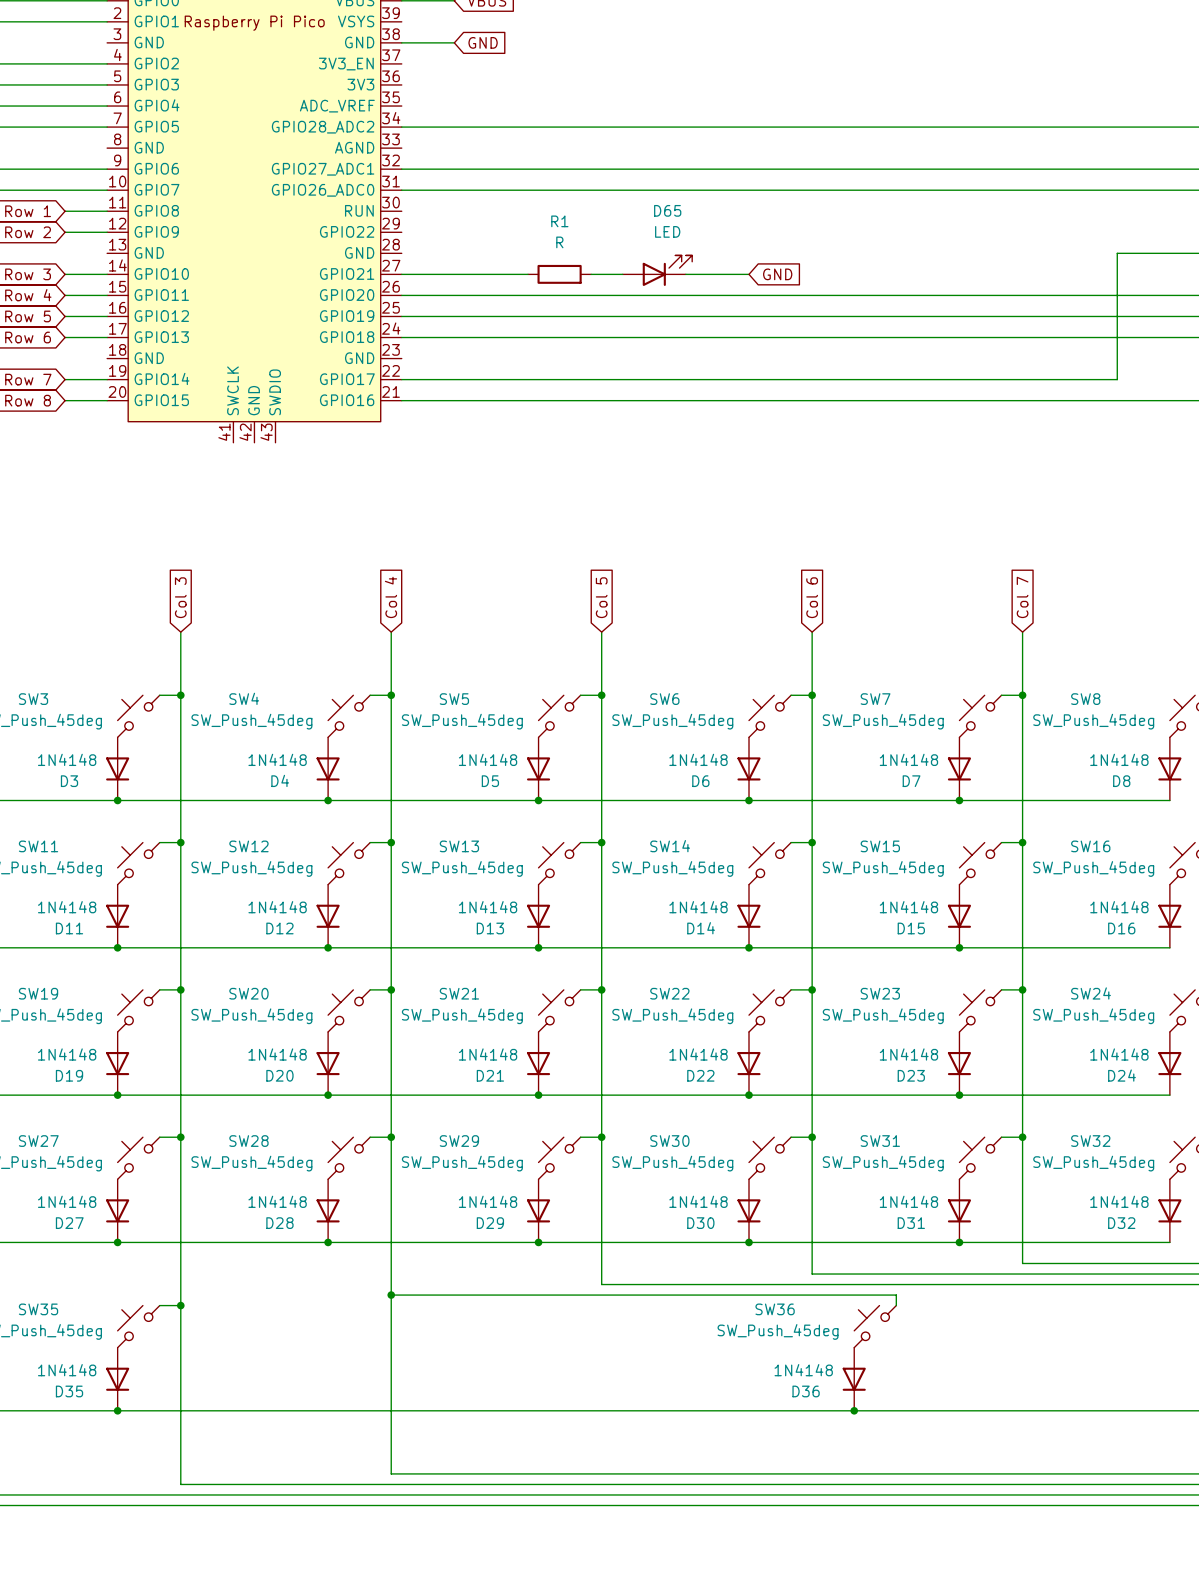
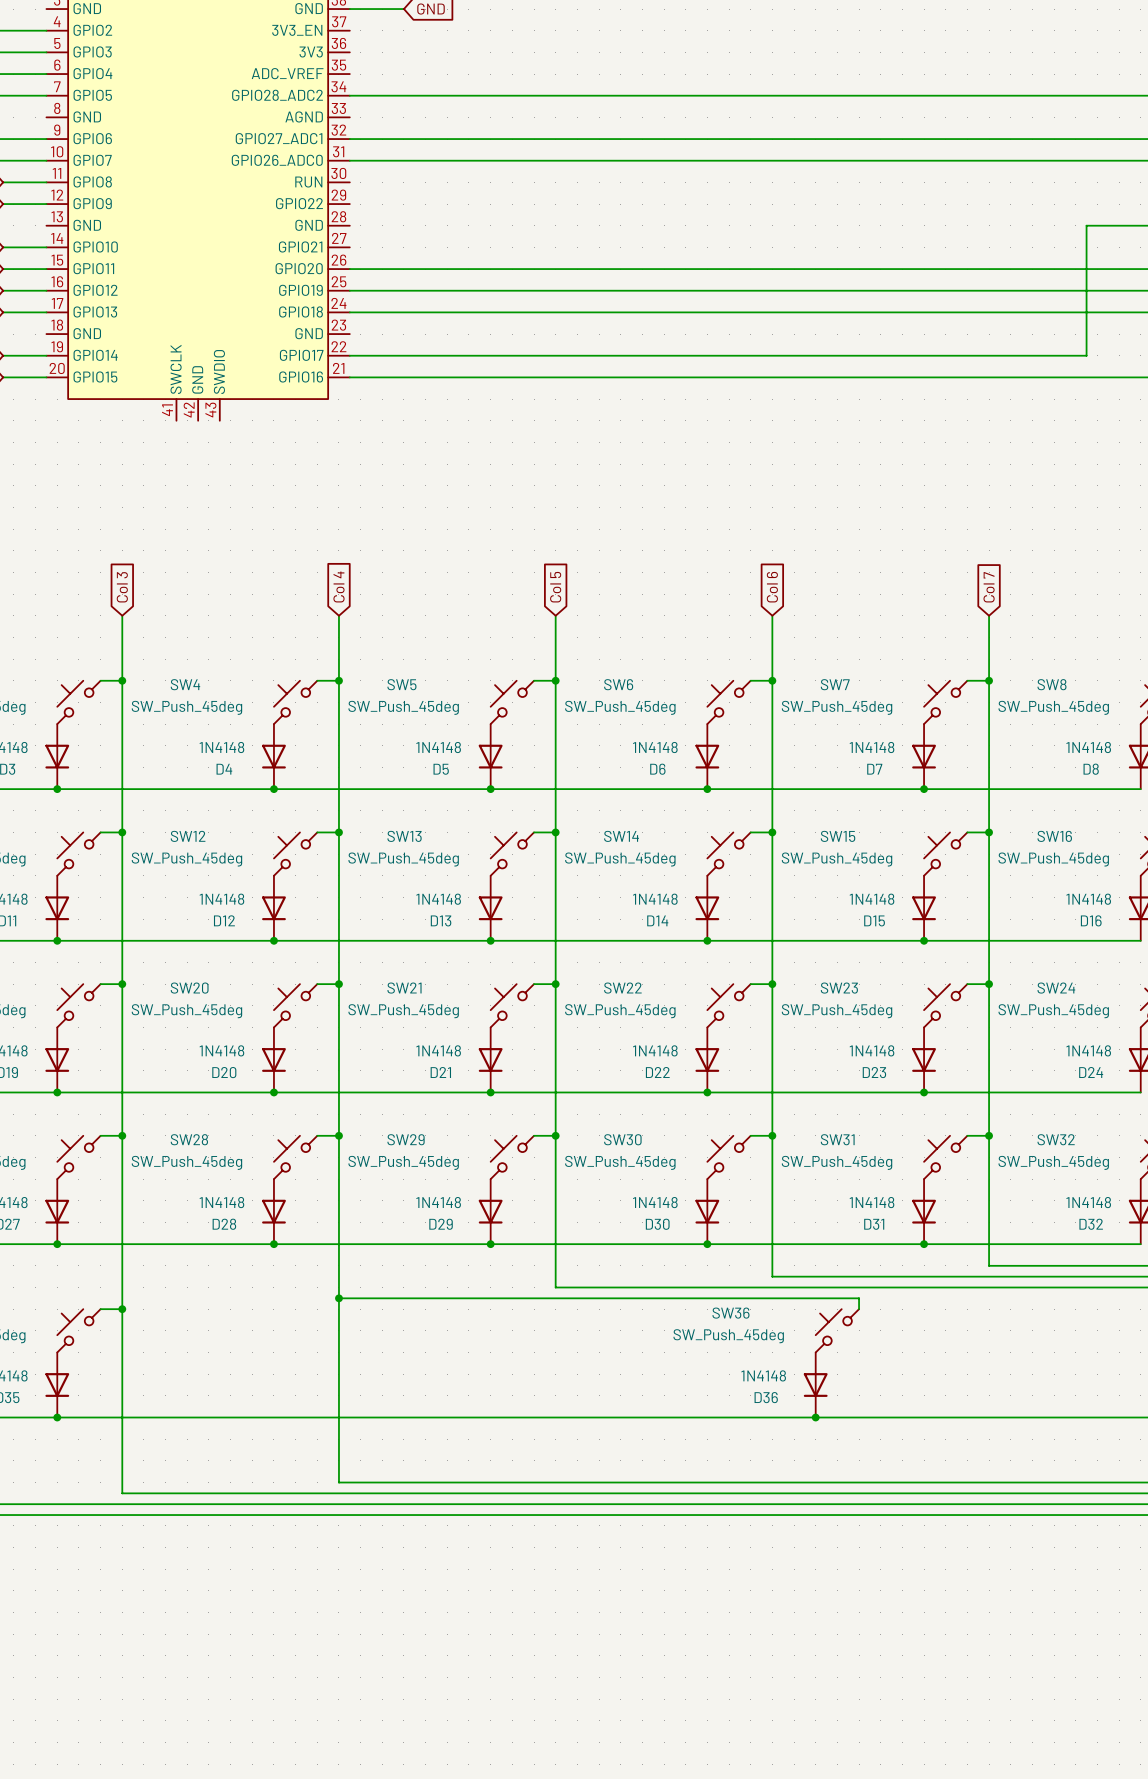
D65: LED (657, 270) -> none
wire: (401, 274) (528, 274) -> none
R1: R (559, 274) -> none
wire: (591, 274) (622, 274) -> none
wire: (685, 274) (749, 274) -> none
global label: GND (777, 274) -> none

